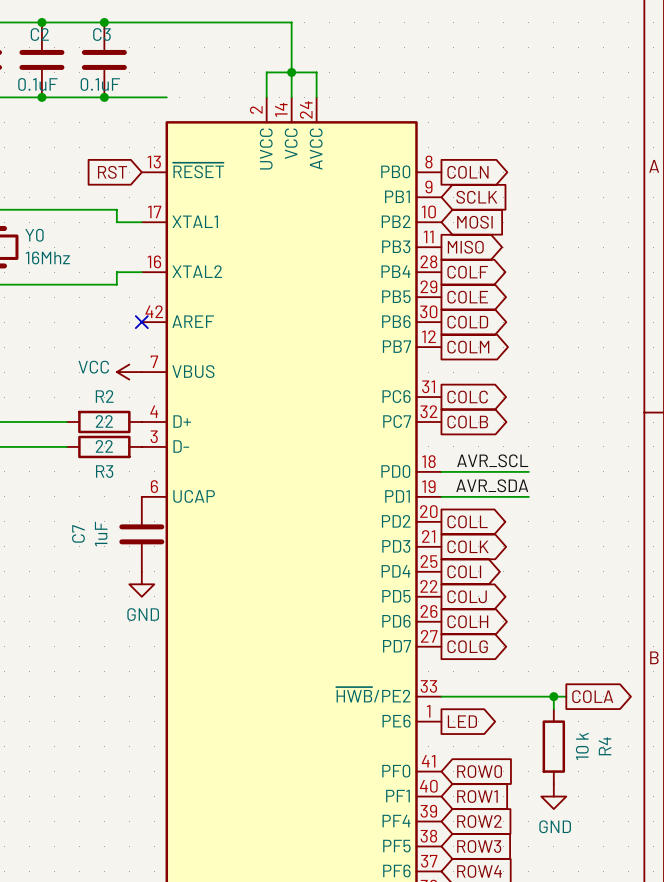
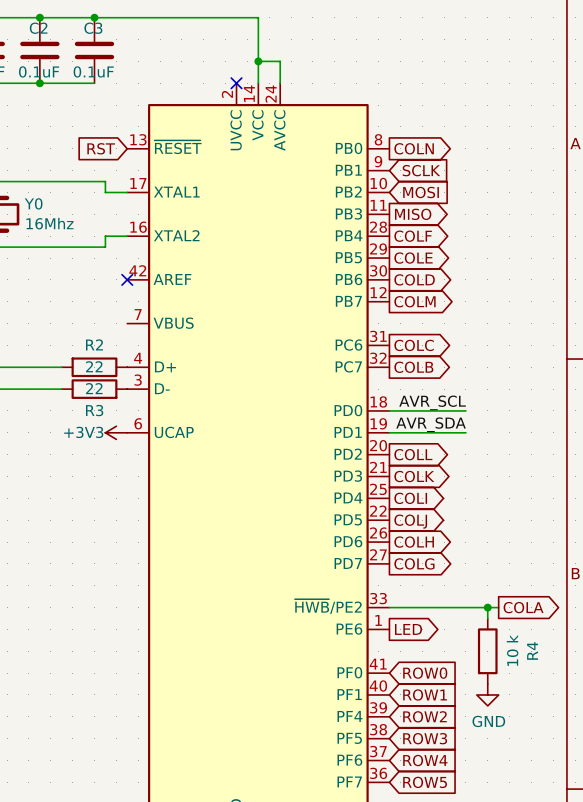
wire: (291, 72) (266, 72) (266, 97) -> none
wire: (104, 97) (166, 97) -> none
junction: (104, 97) -> none
no-connect mark: none -> (236, 83)
power symbol: VCC (129, 372) -> none
power symbol: none -> +3V3 (116, 432)
C7: 1uF (141, 534) -> none
power symbol: GND (141, 584) -> none

